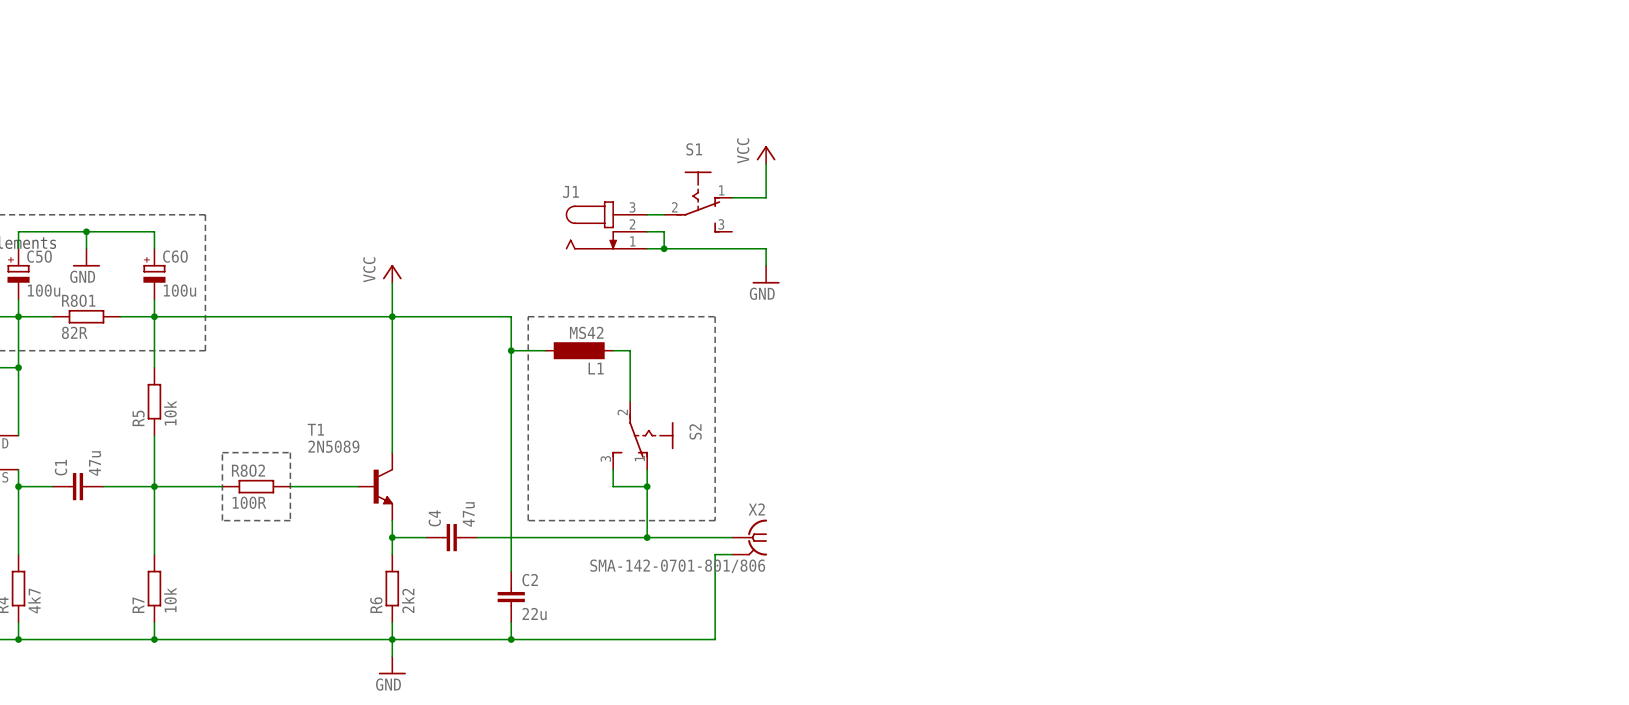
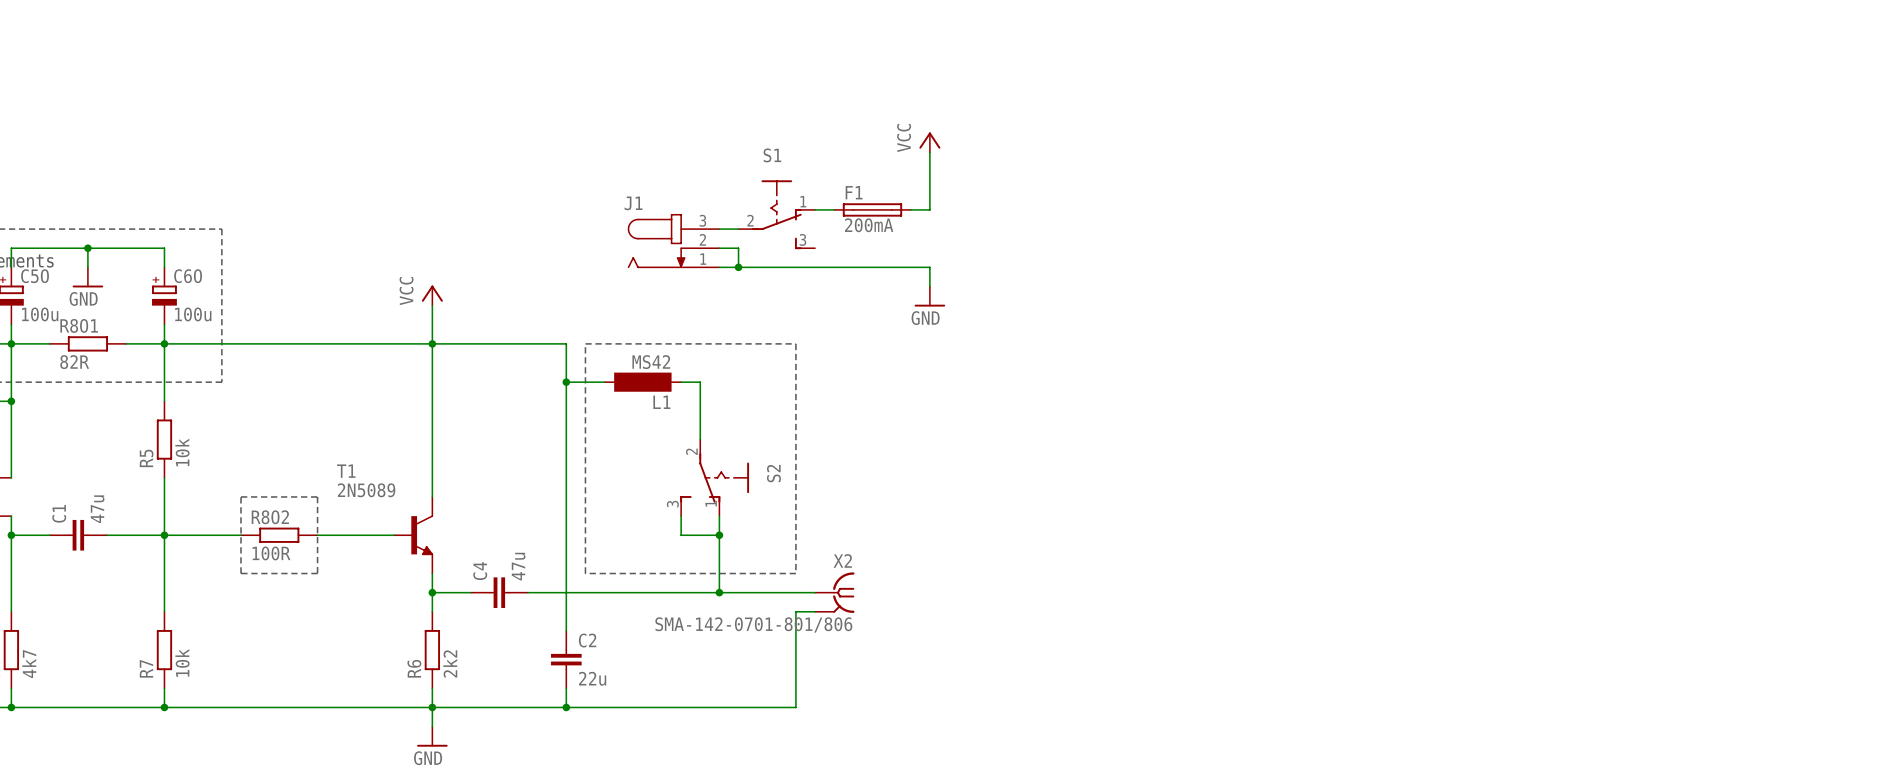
wire: none -> (929, 152) (929, 209) (910, 209)
power symbol position: VCC (766, 154) -> VCC (929, 142)
wire: (766, 163) (766, 197) (749, 197) -> none
F1: none -> 200mA (872, 209)
wire: (766, 248) (766, 265) -> (853, 267) (929, 267) (929, 286)
power symbol position: GND (766, 274) -> GND (929, 296)

